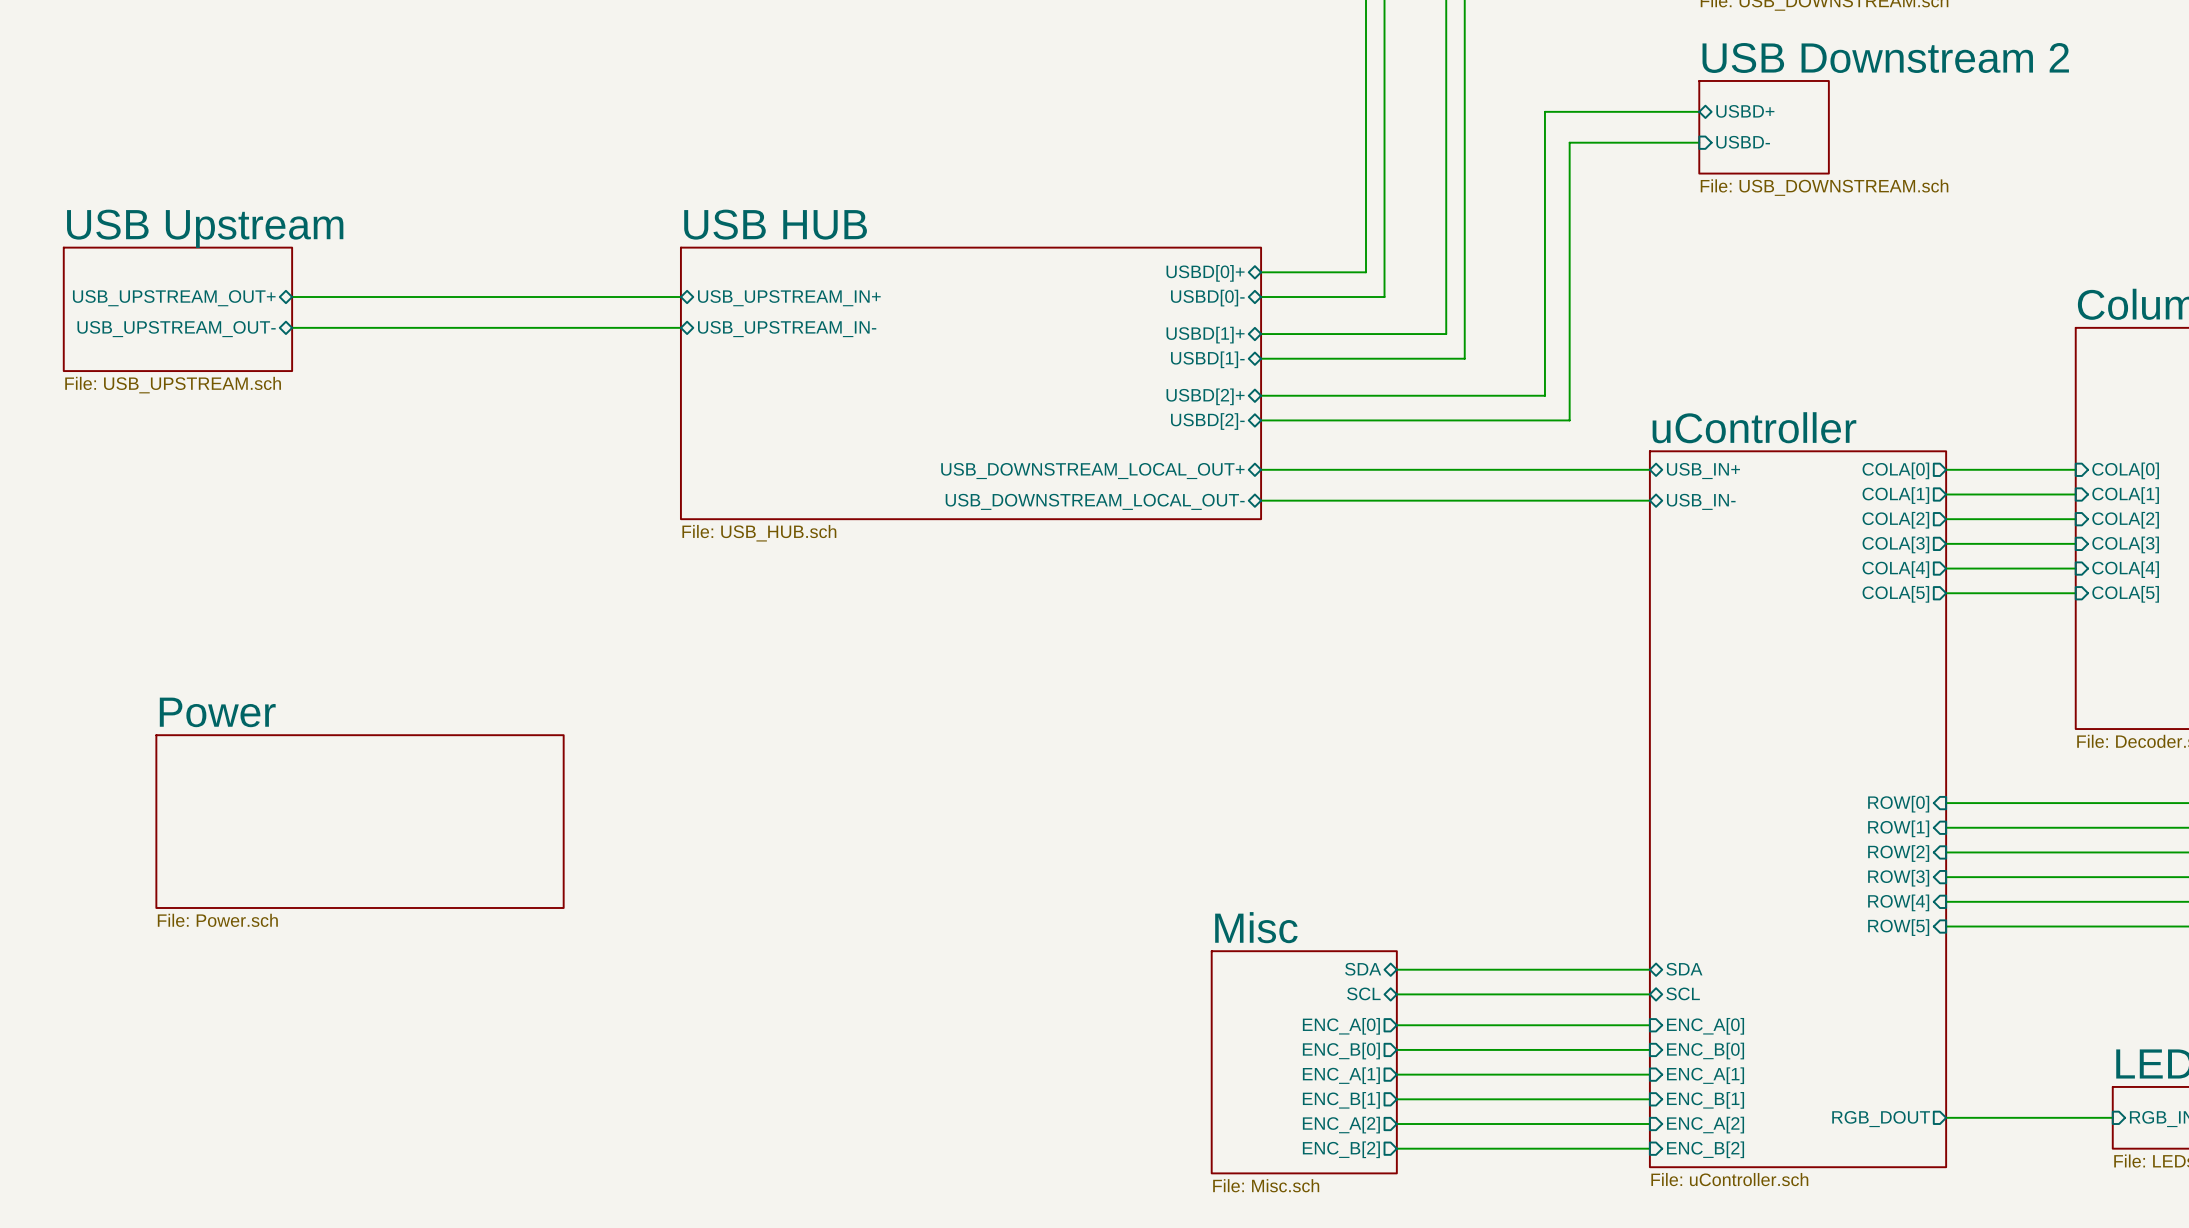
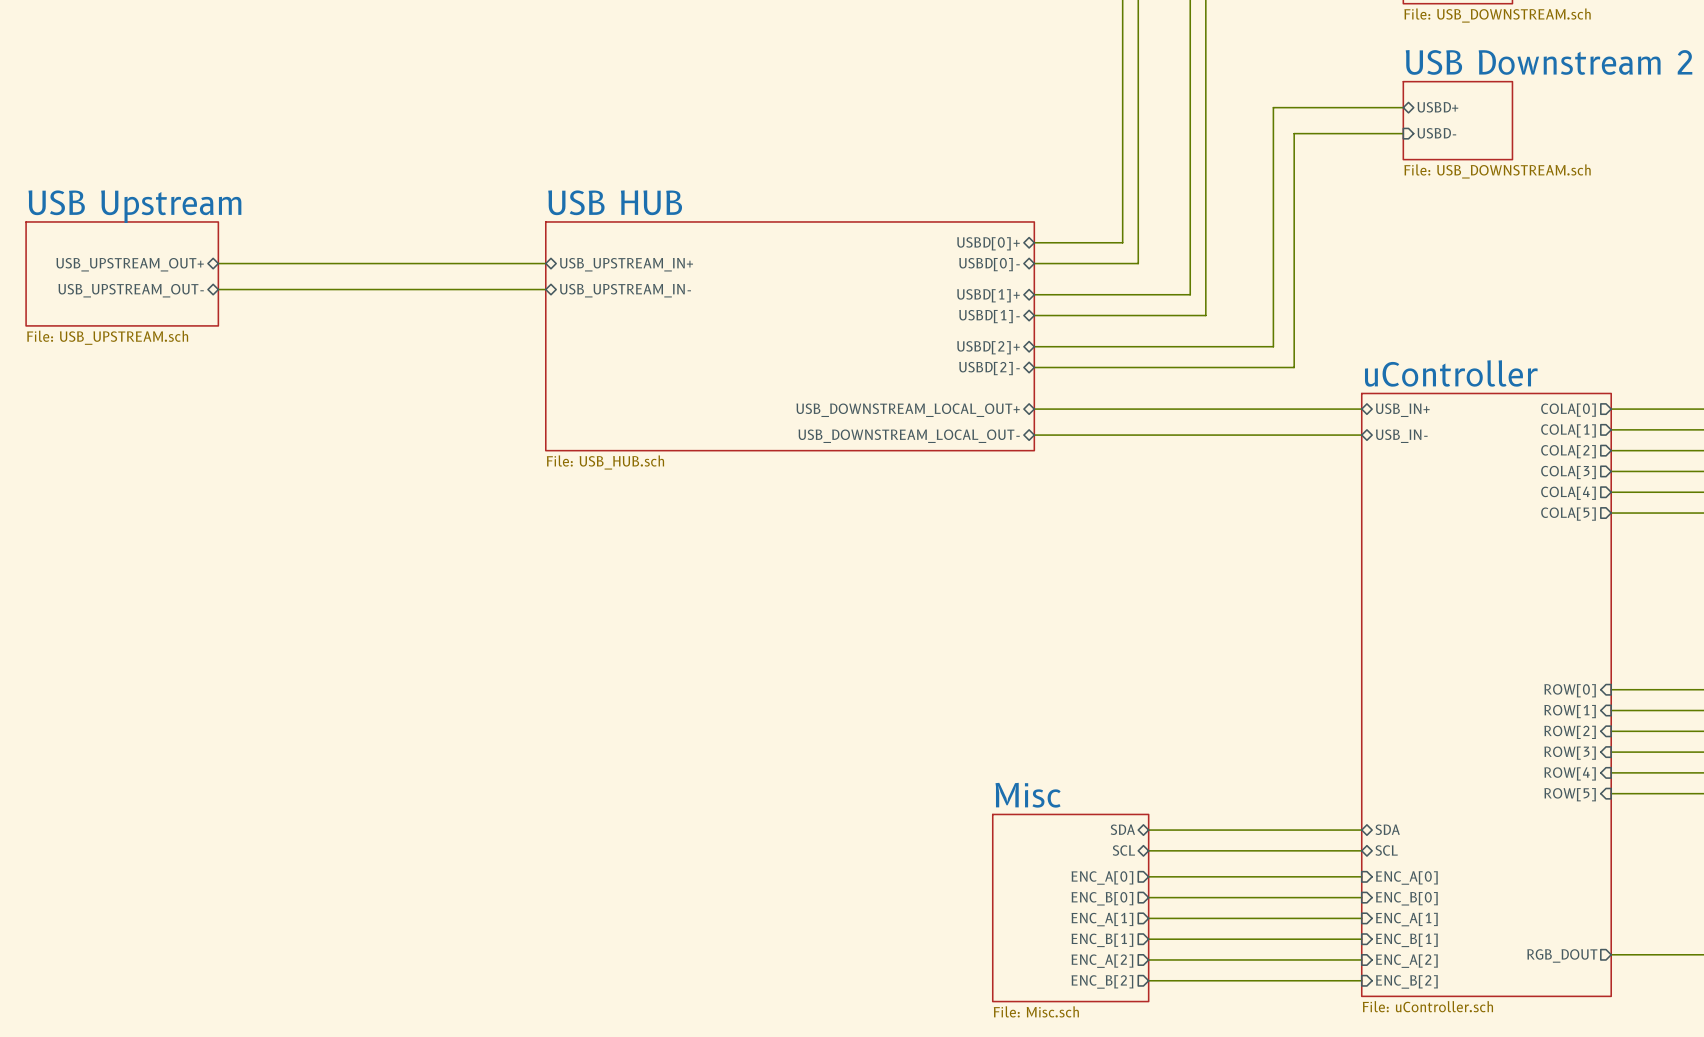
sheet Power: File: Power.sch (360, 821) -> none

